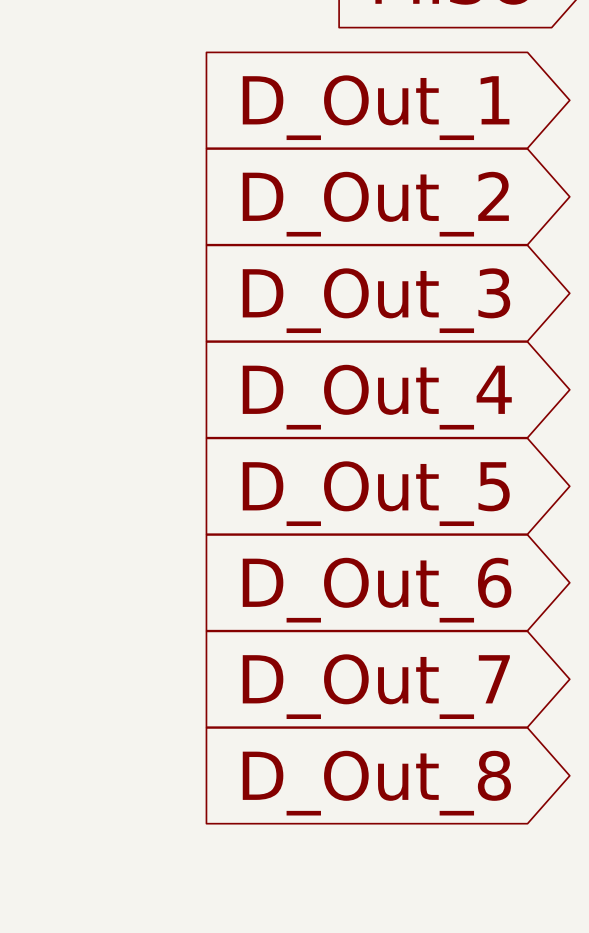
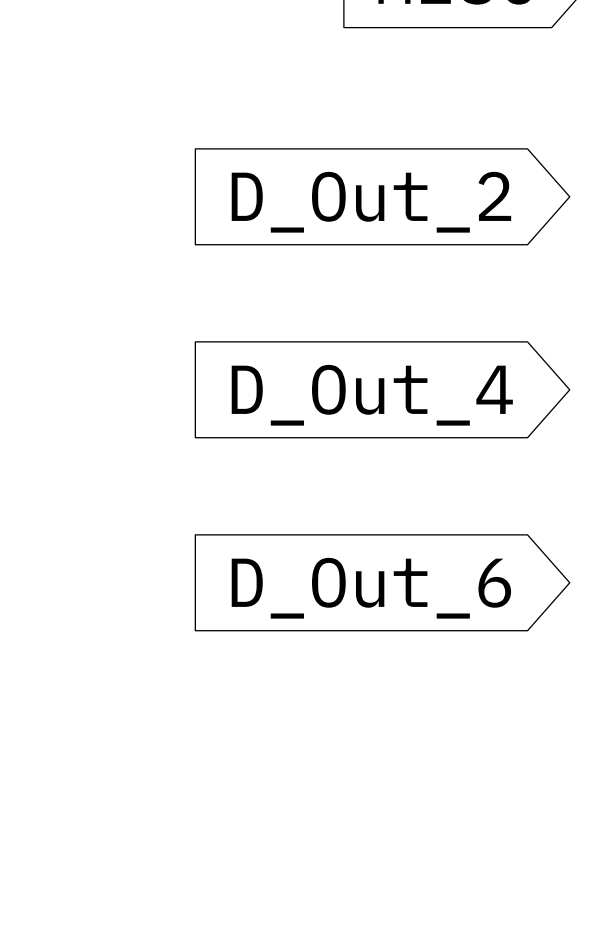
global label: D_Out_1 (376, 107) -> none
global label: D_Out_3 (376, 300) -> none
global label: D_Out_5 (376, 493) -> none
global label: D_Out_7 (376, 686) -> none
global label: D_Out_8 (376, 783) -> none

